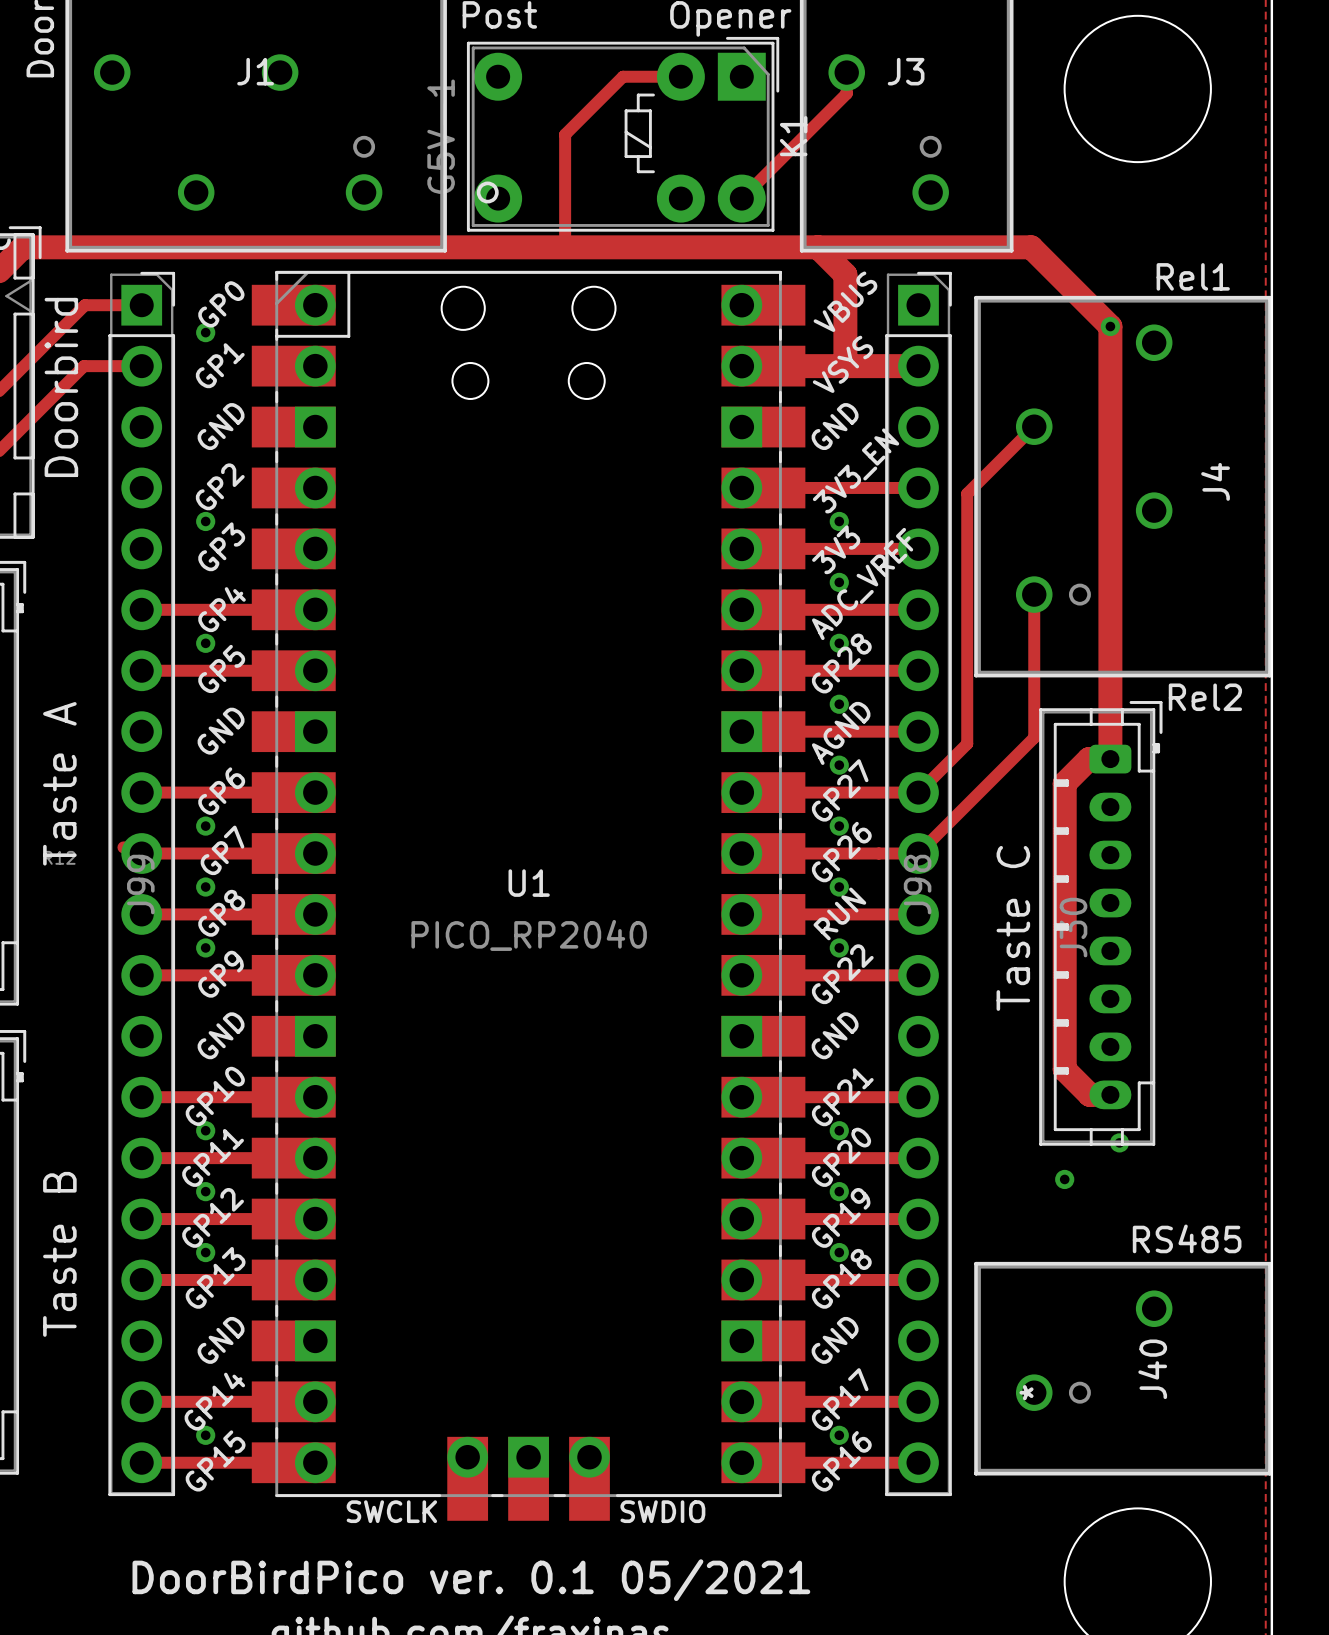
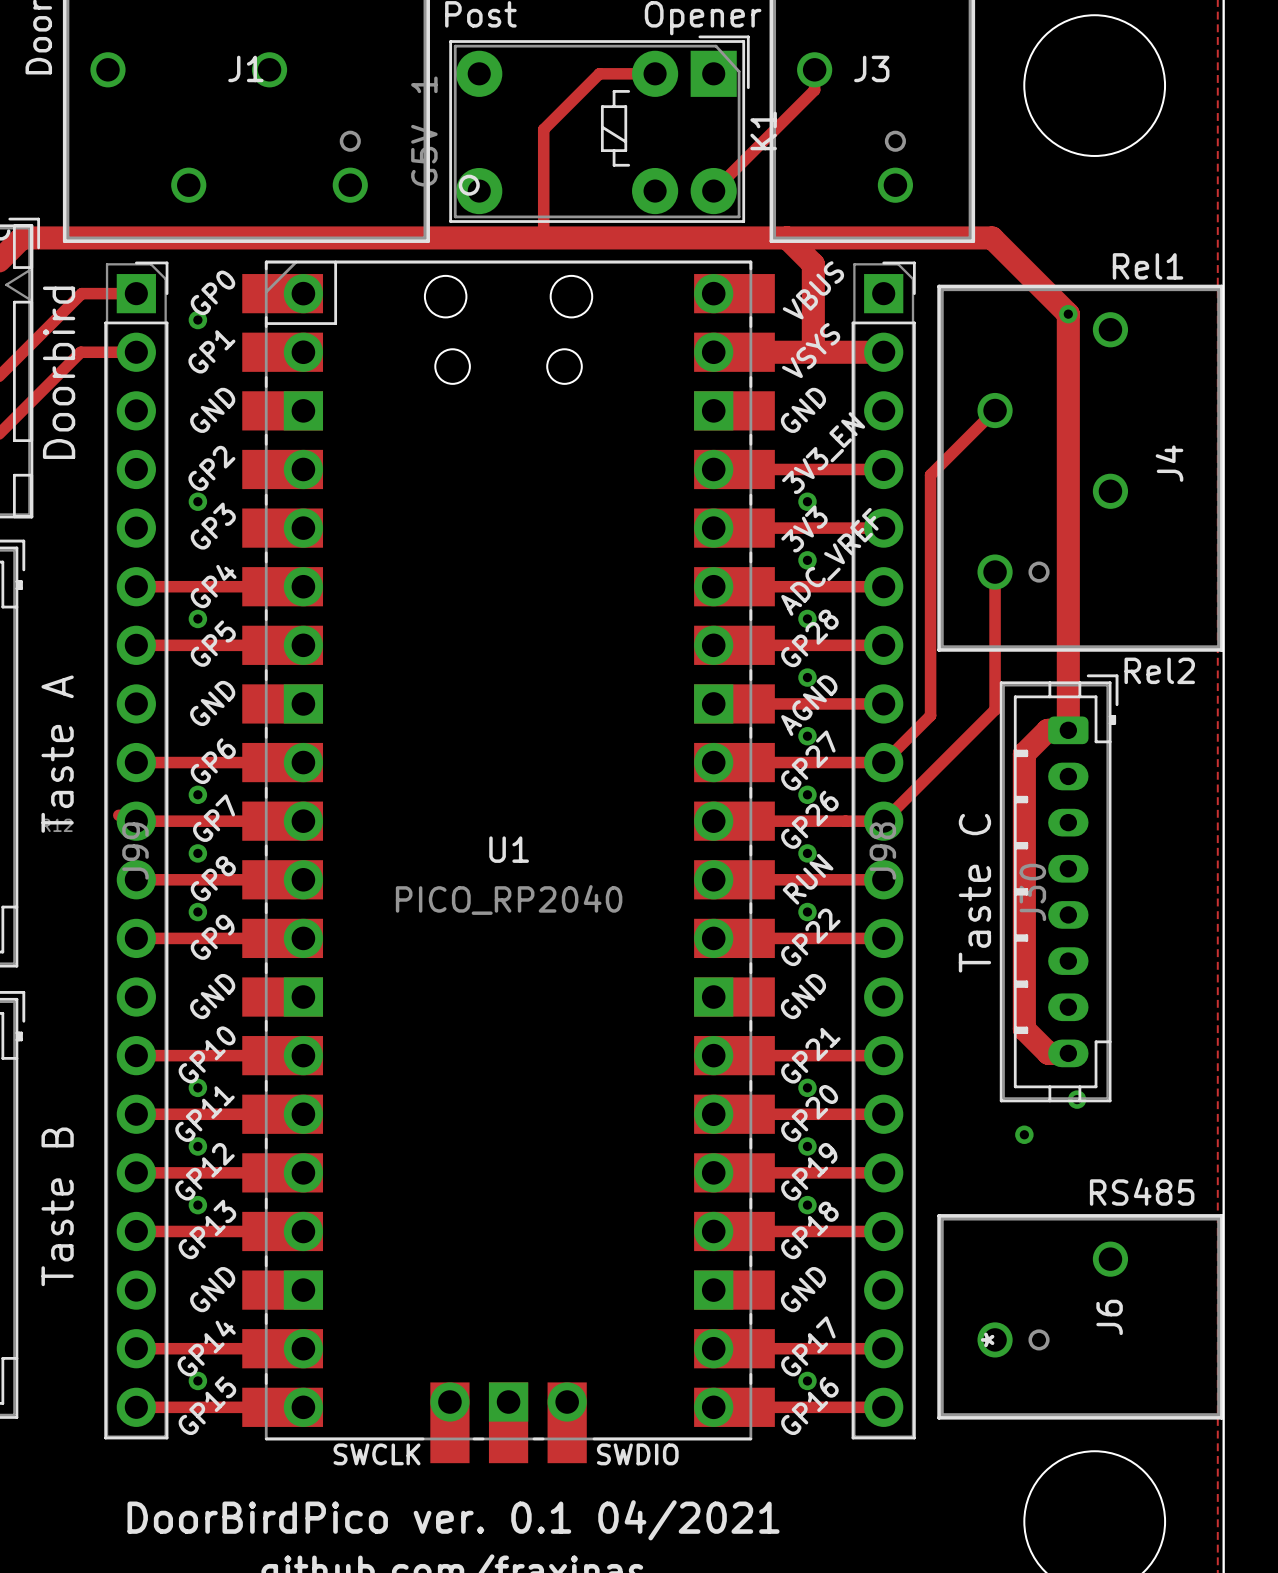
J40 name: J40 (1152, 1369) -> J6 (1109, 1317)
text: DoorBirdPico ver. 0.1 05/2021 (471, 1580) -> DoorBirdPico ver. 0.1 04/2021 (453, 1520)

